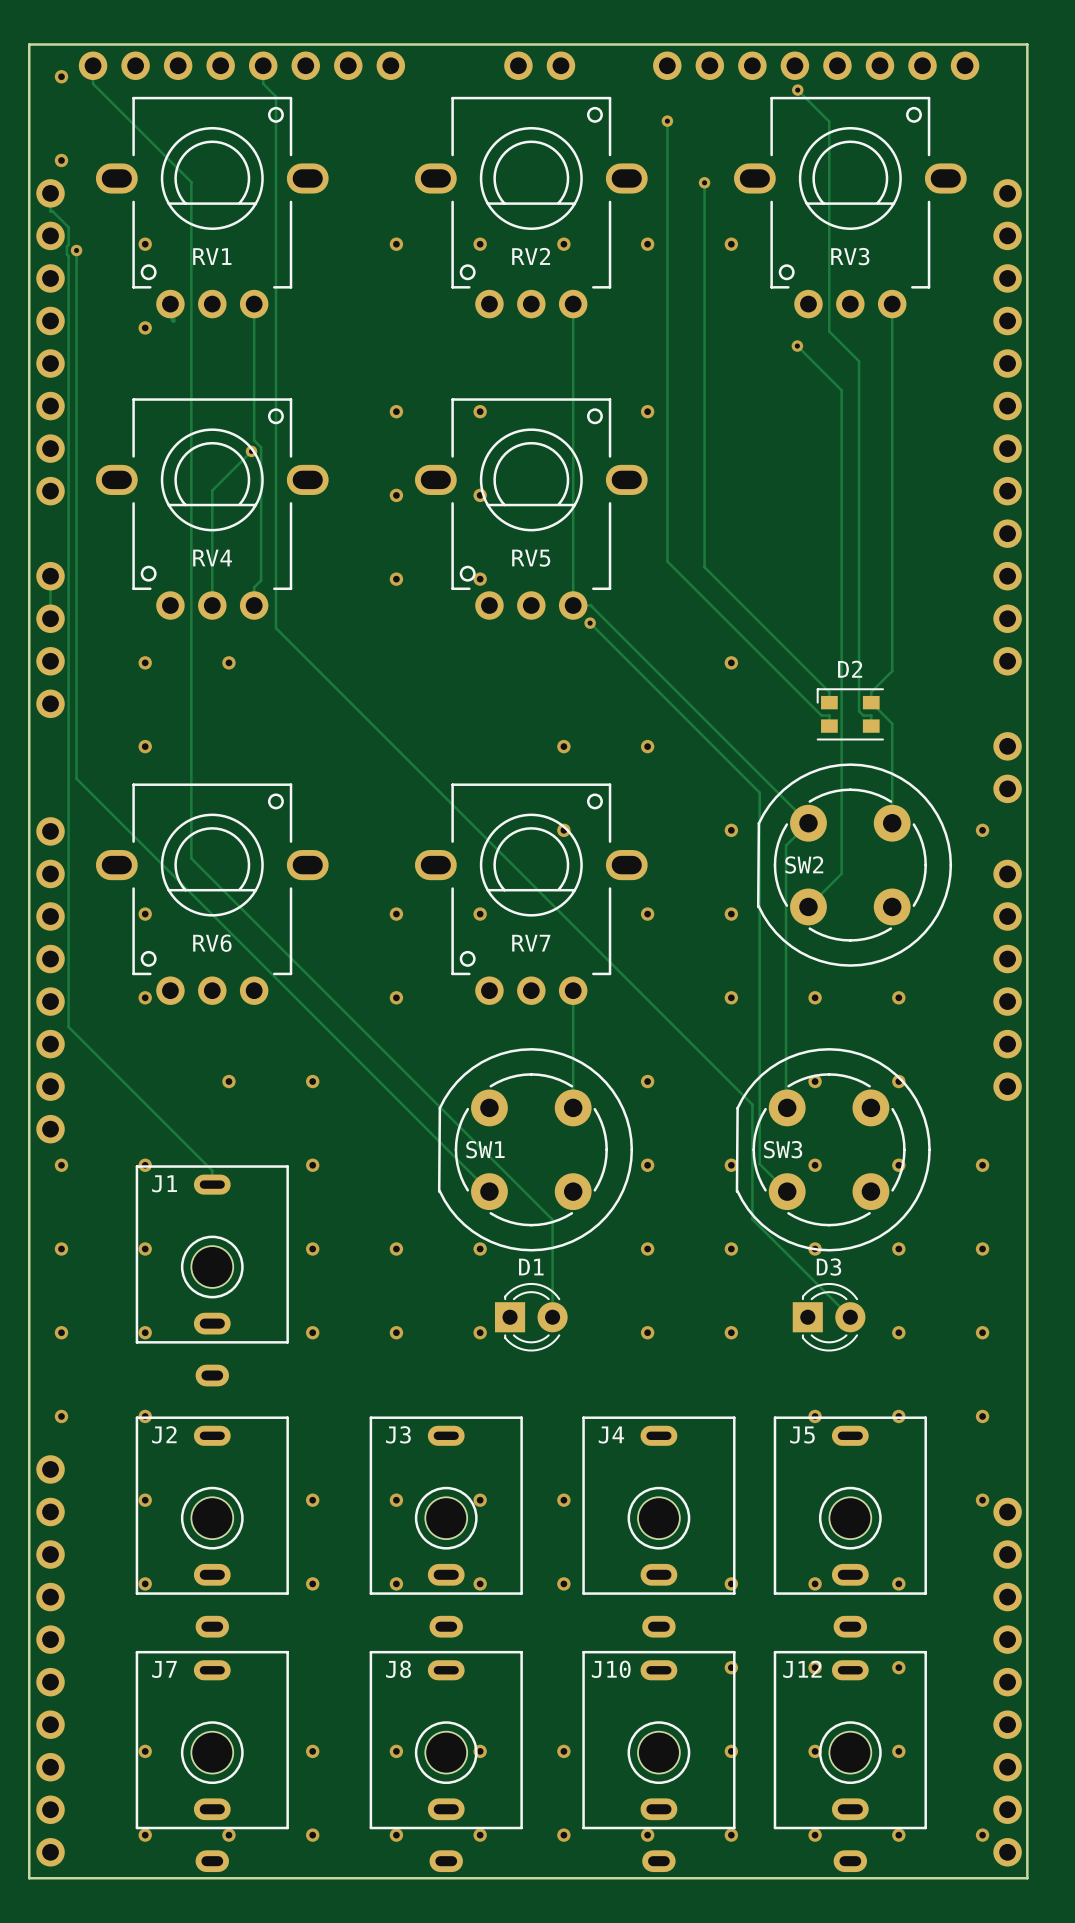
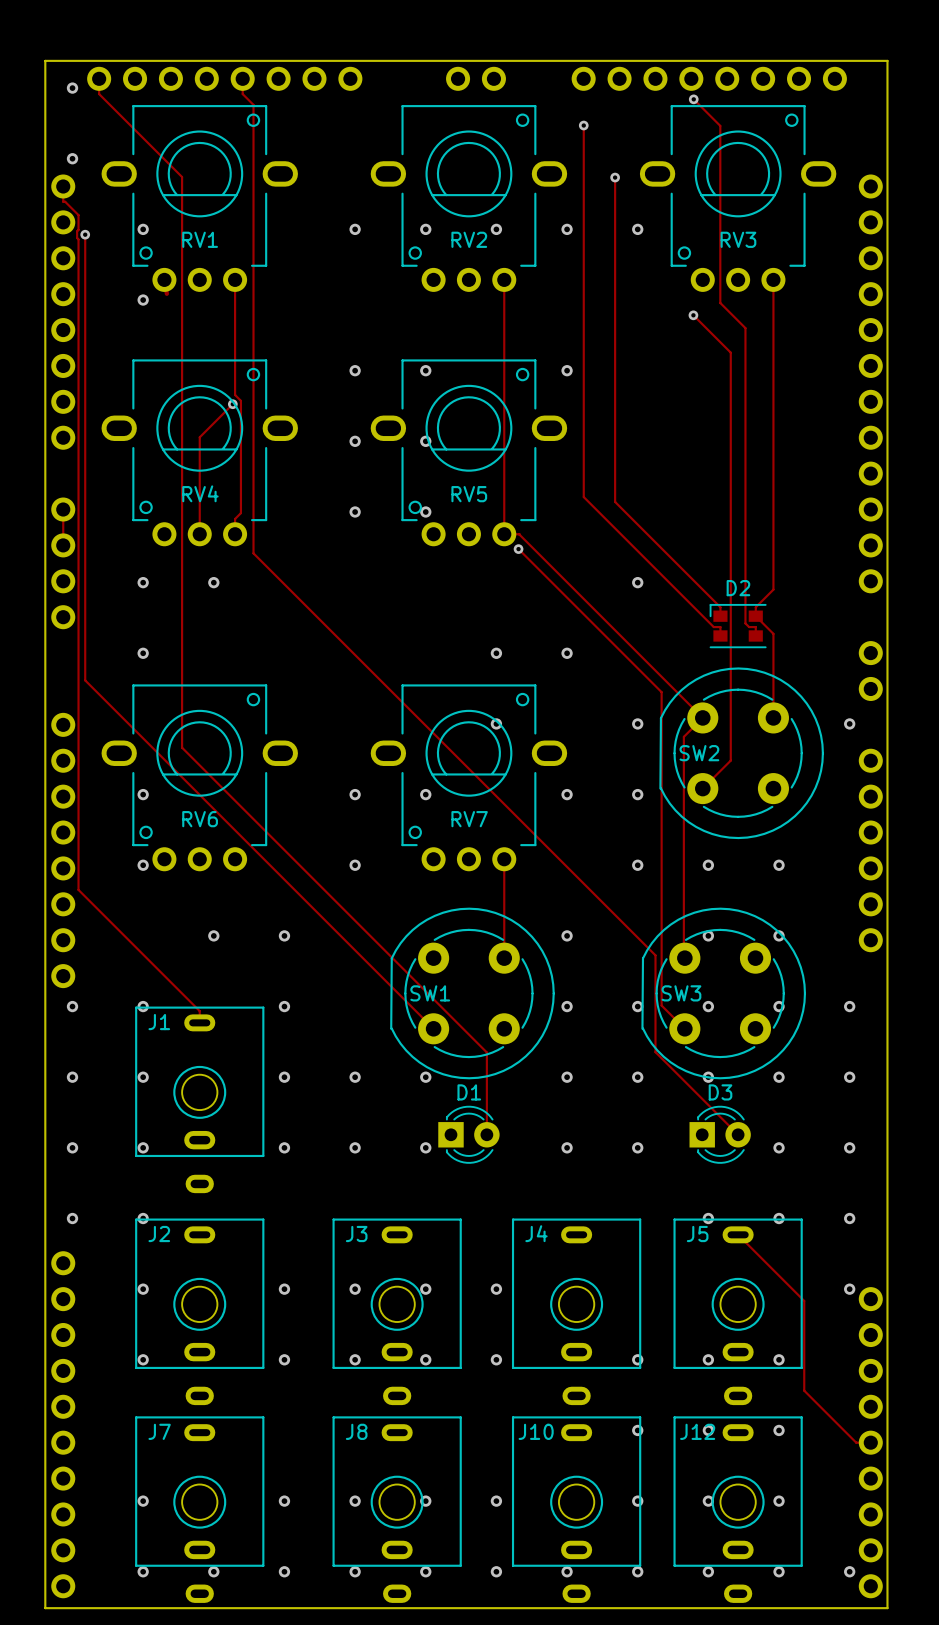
track: none -> (738, 1234) (804, 1300) (804, 1390) (856, 1442) (870, 1442)

